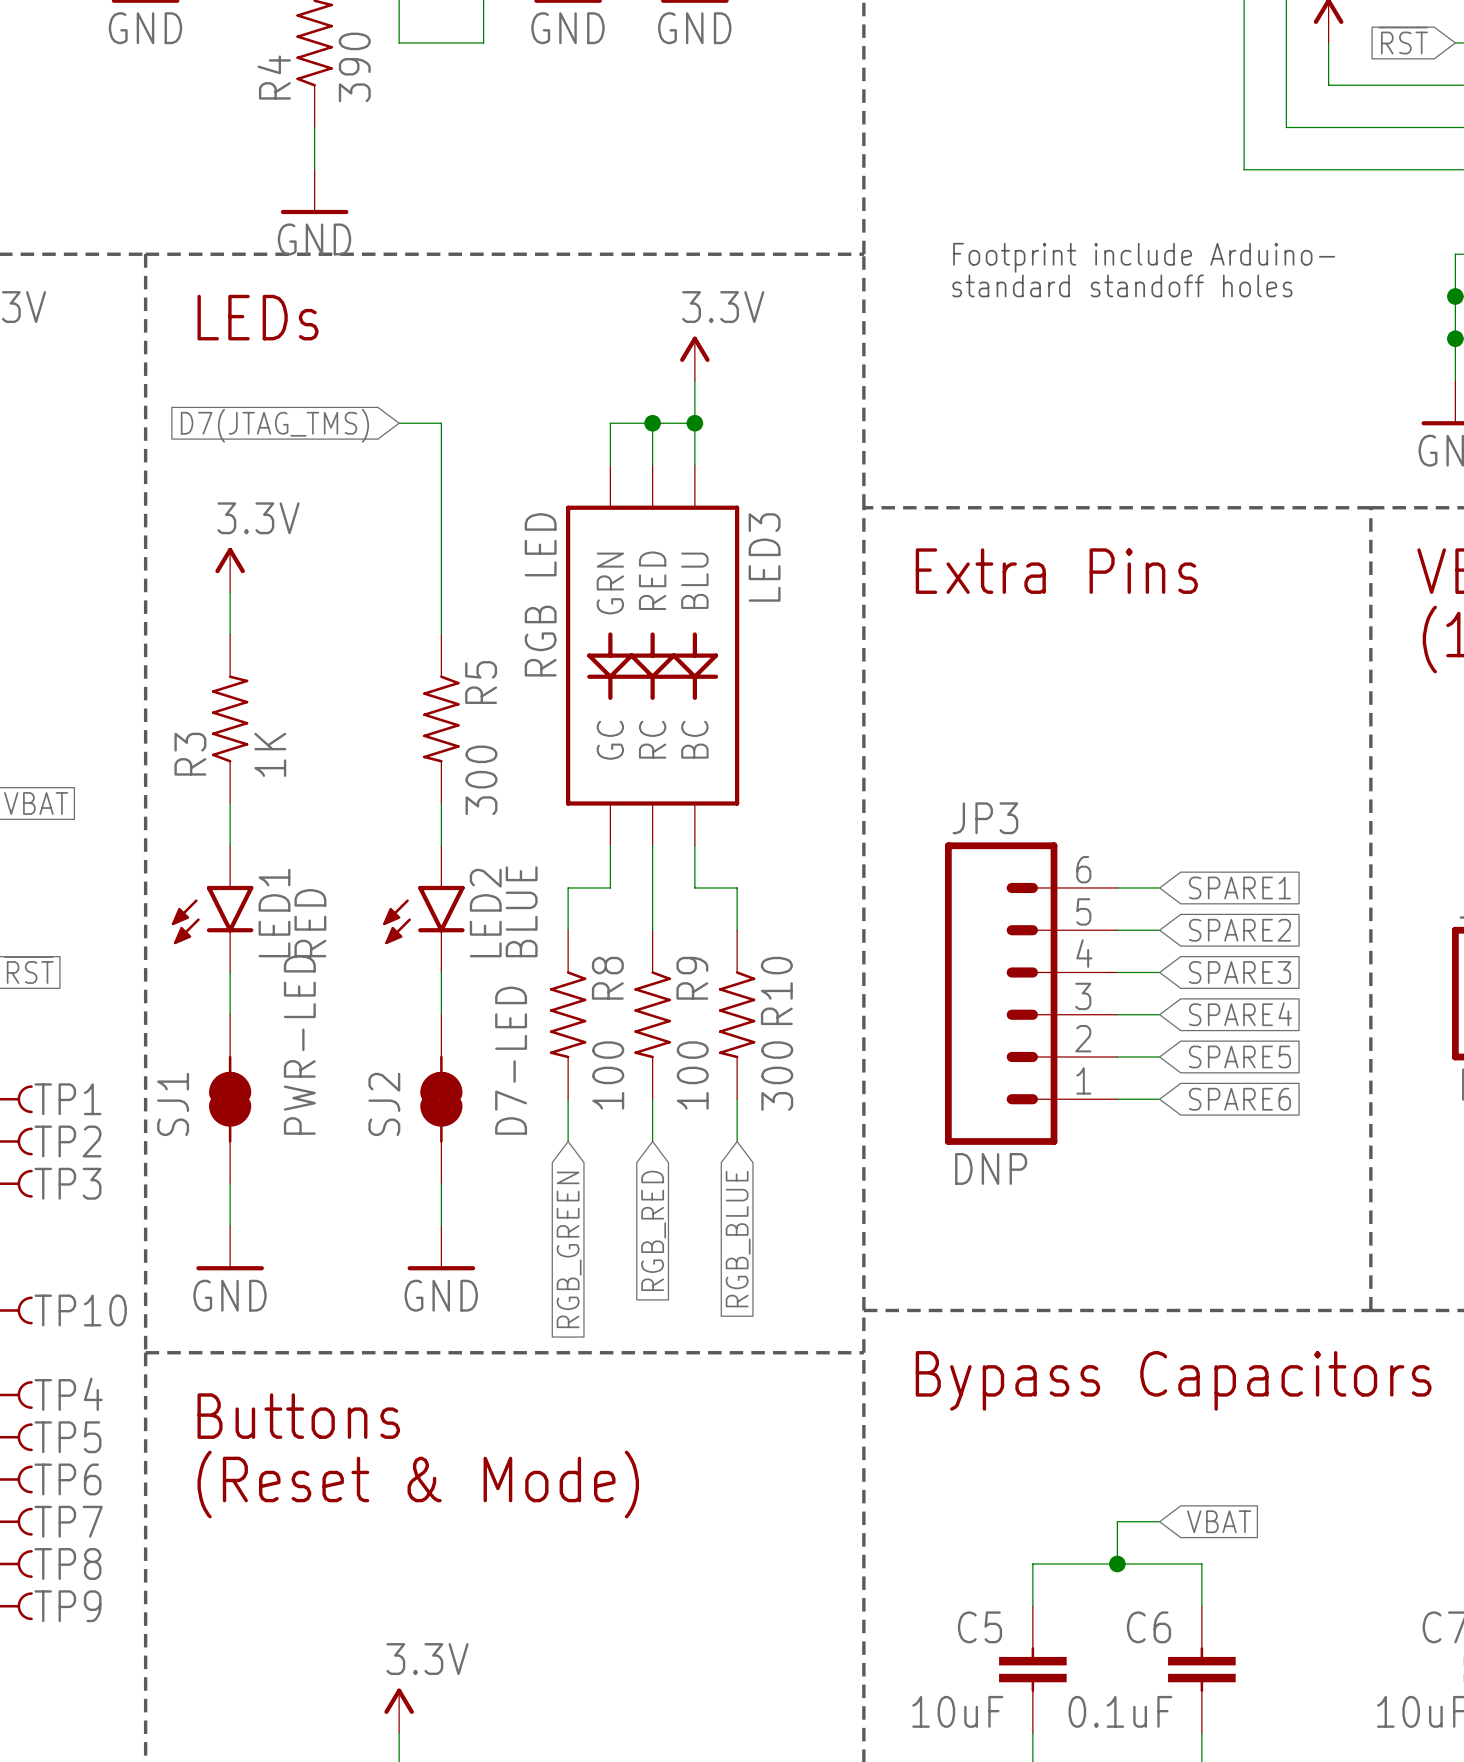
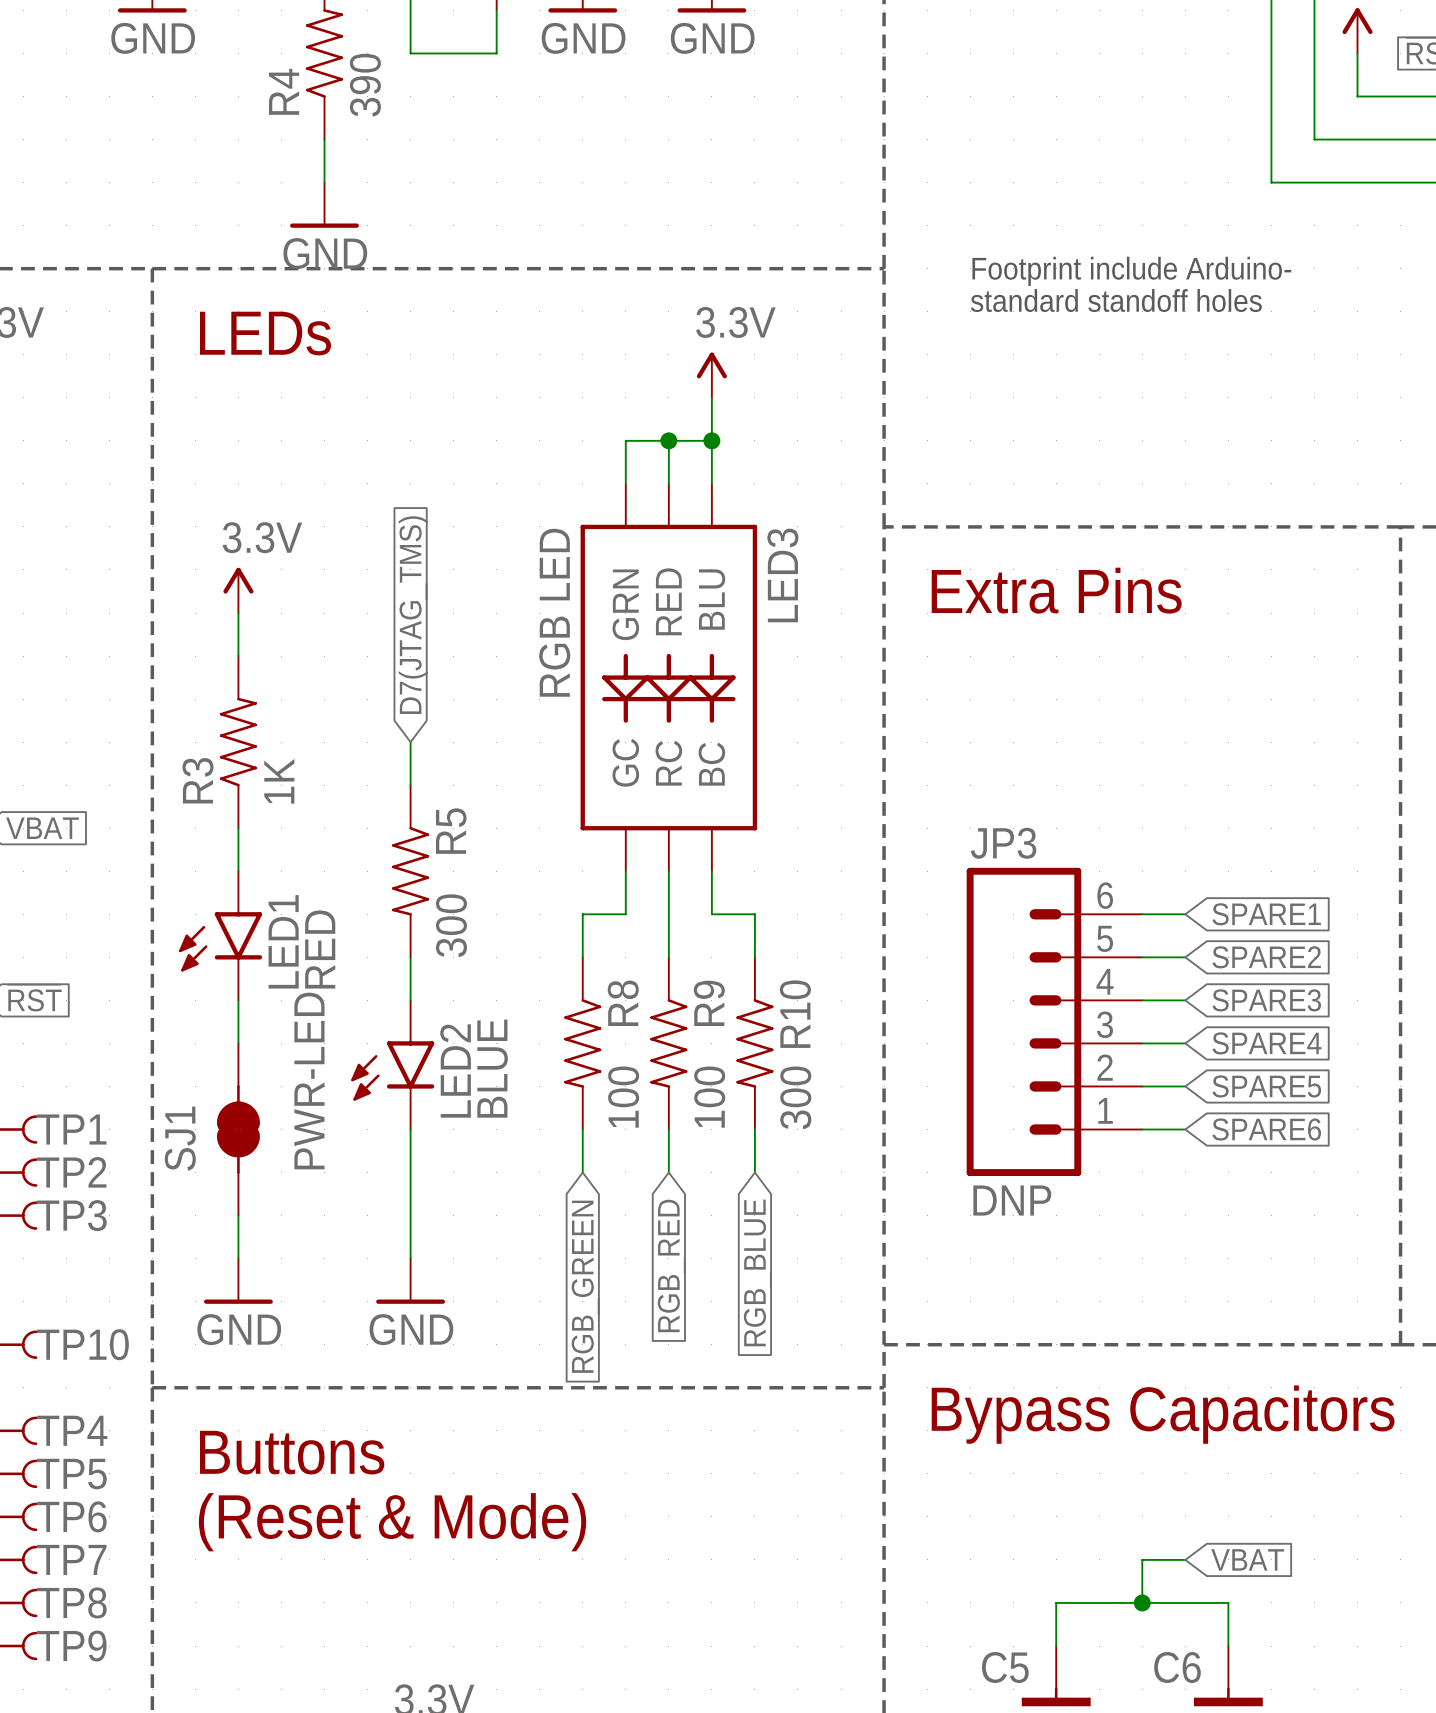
wire: (399, 423) (441, 423) (441, 634) -> none
global label rotation: 0° (274, 425) -> 90° clockwise (413, 615)
R5 position: (441, 718) -> (410, 871)
wire: (441, 803) (441, 845) -> (410, 742) (410, 785)
LED2 position: (423, 909) -> (392, 1064)
wire: (441, 972) (441, 1014) -> (410, 957) (410, 1000)
wire: none -> (410, 1129) (410, 1258)
SJ2: D7-LED (441, 1099) -> none
wire: (441, 1183) (441, 1225) -> none
power symbol position: GND (441, 1248) -> GND (410, 1281)

